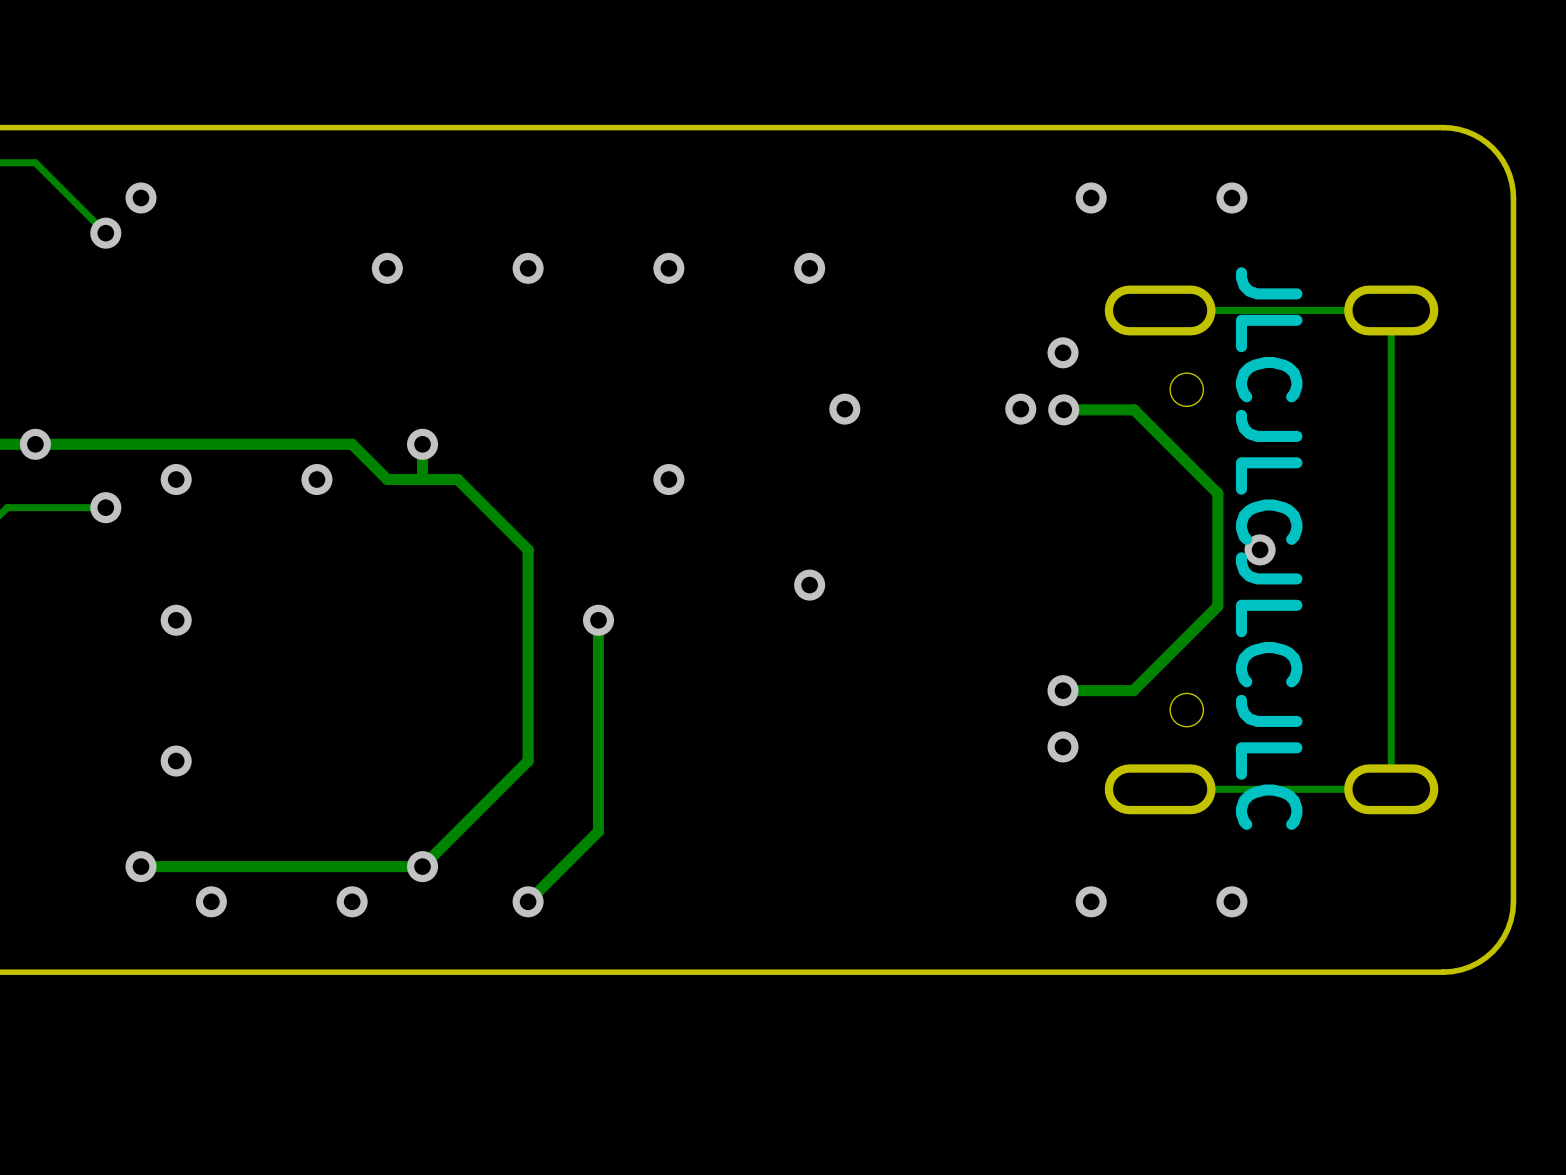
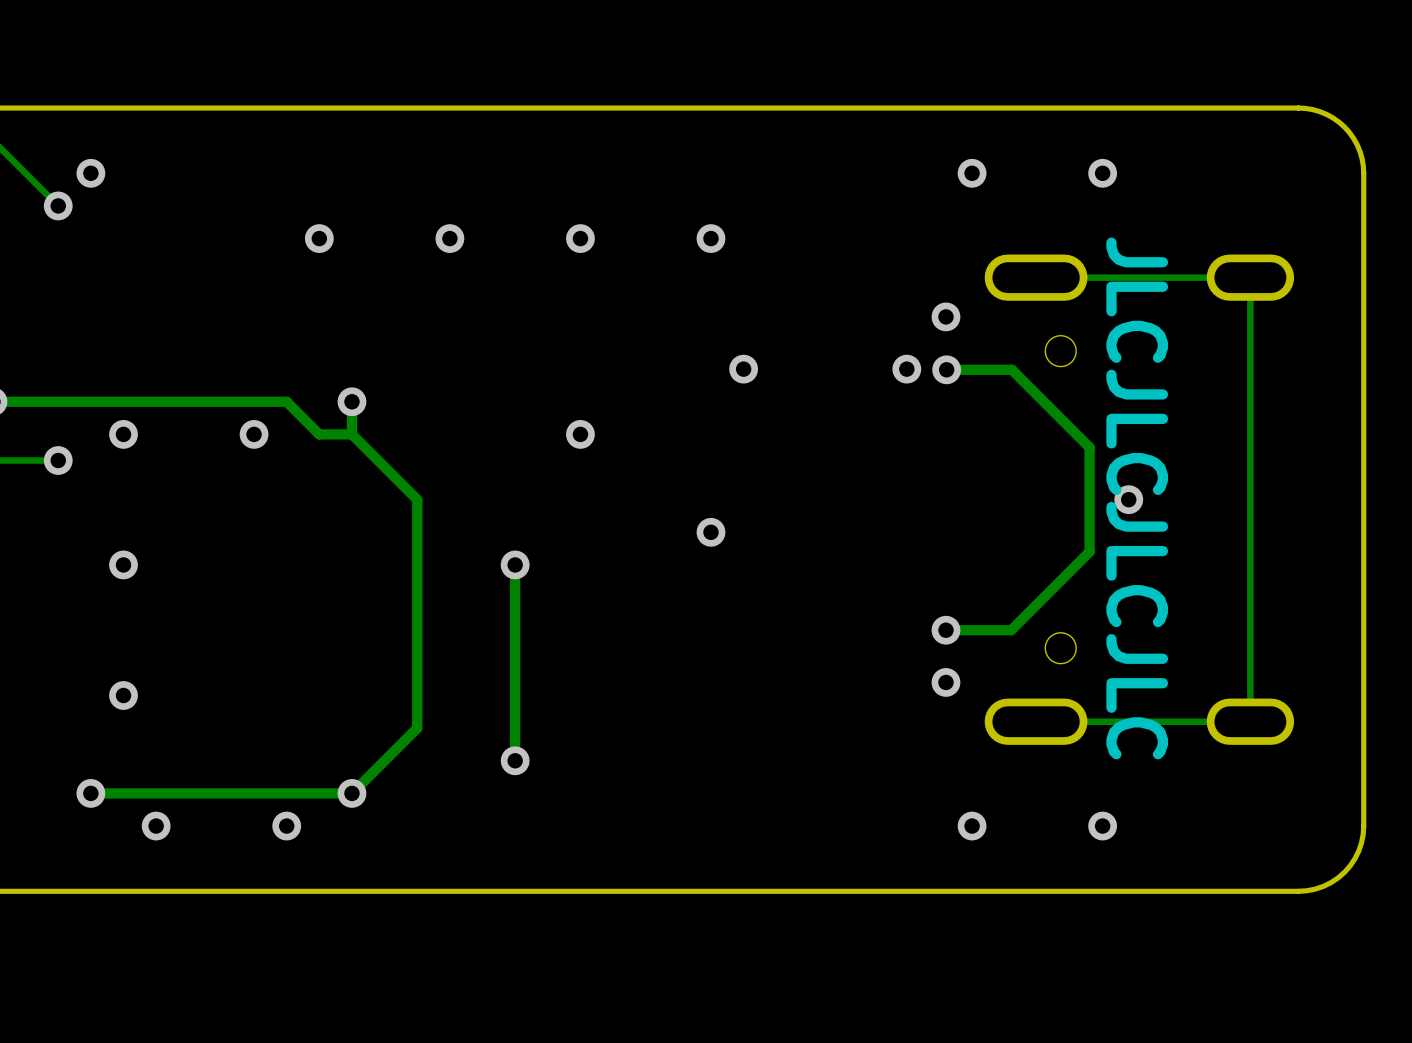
track: (422, 479) (457, 479) (528, 549) (528, 761) (492, 796) -> (351, 434) (417, 499) (417, 728)
track: (598, 831) (528, 901) -> none
via position: (528, 901) -> (515, 760)

